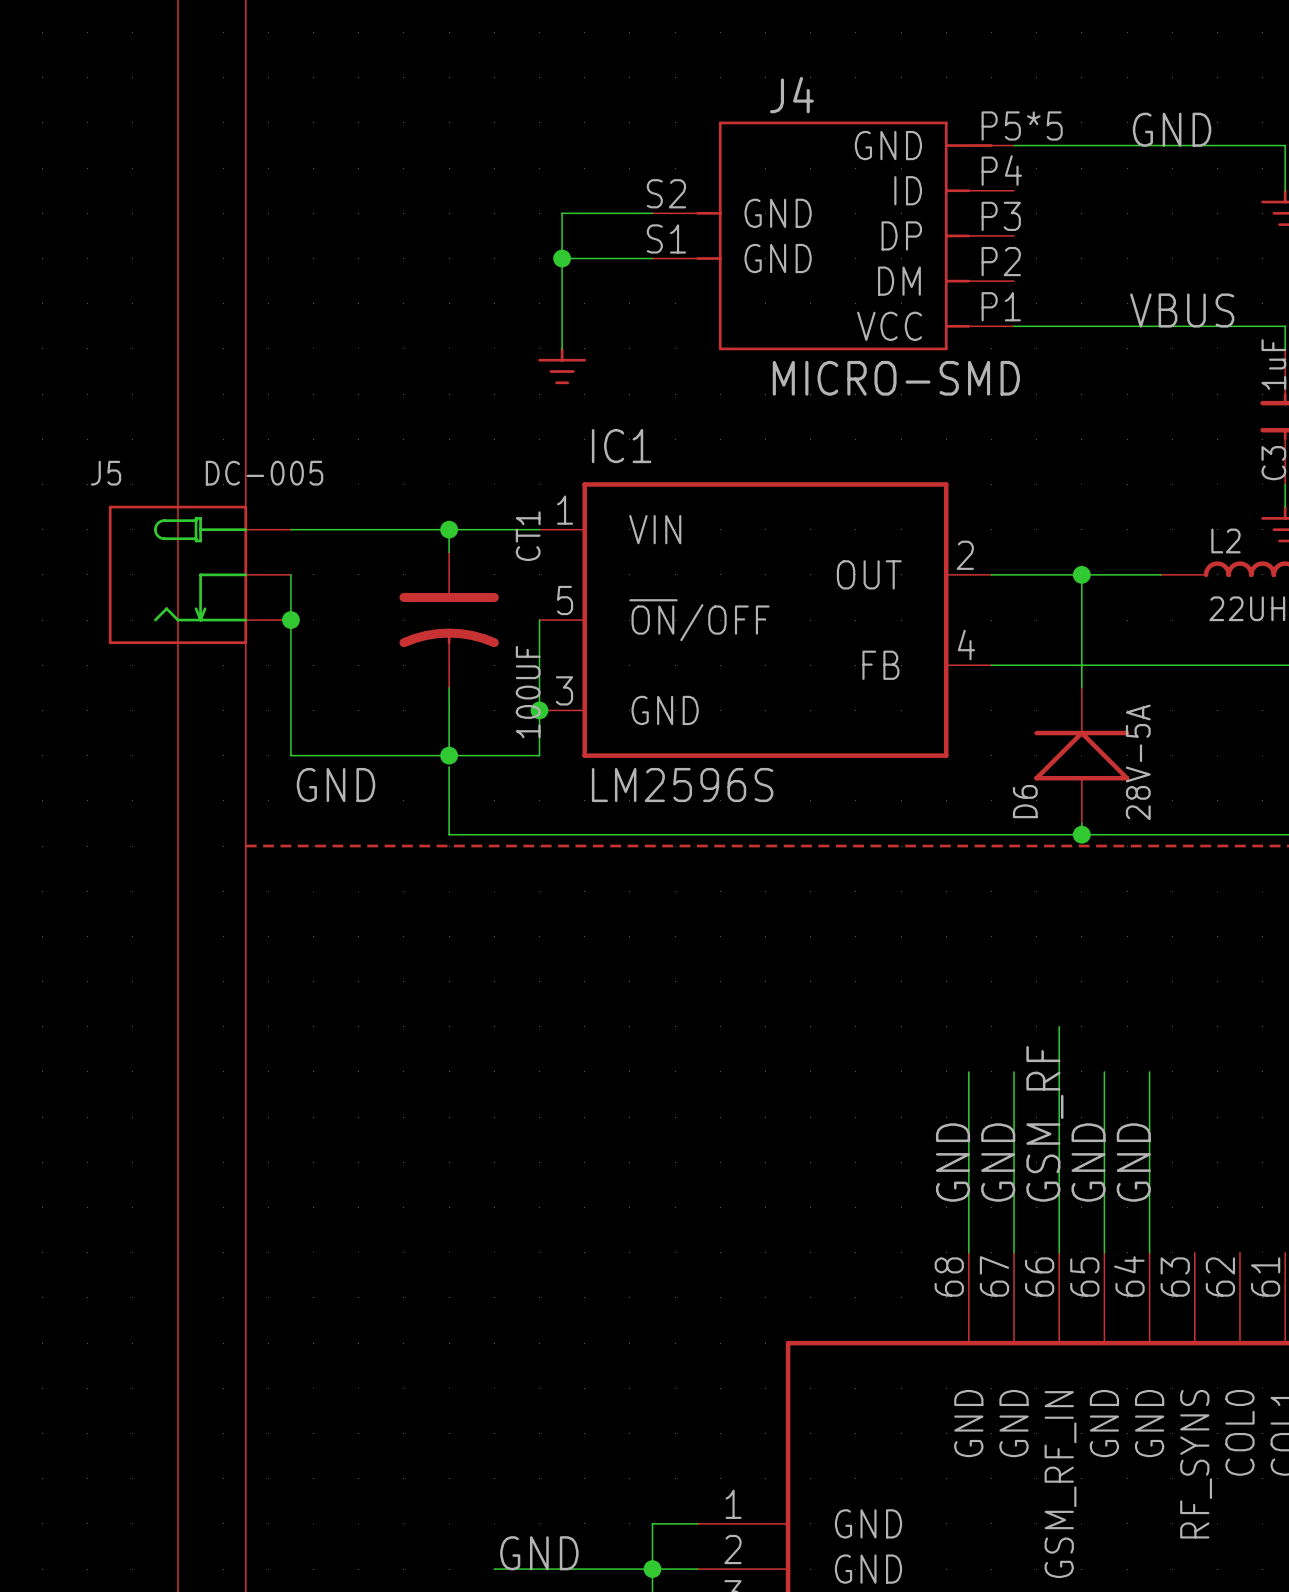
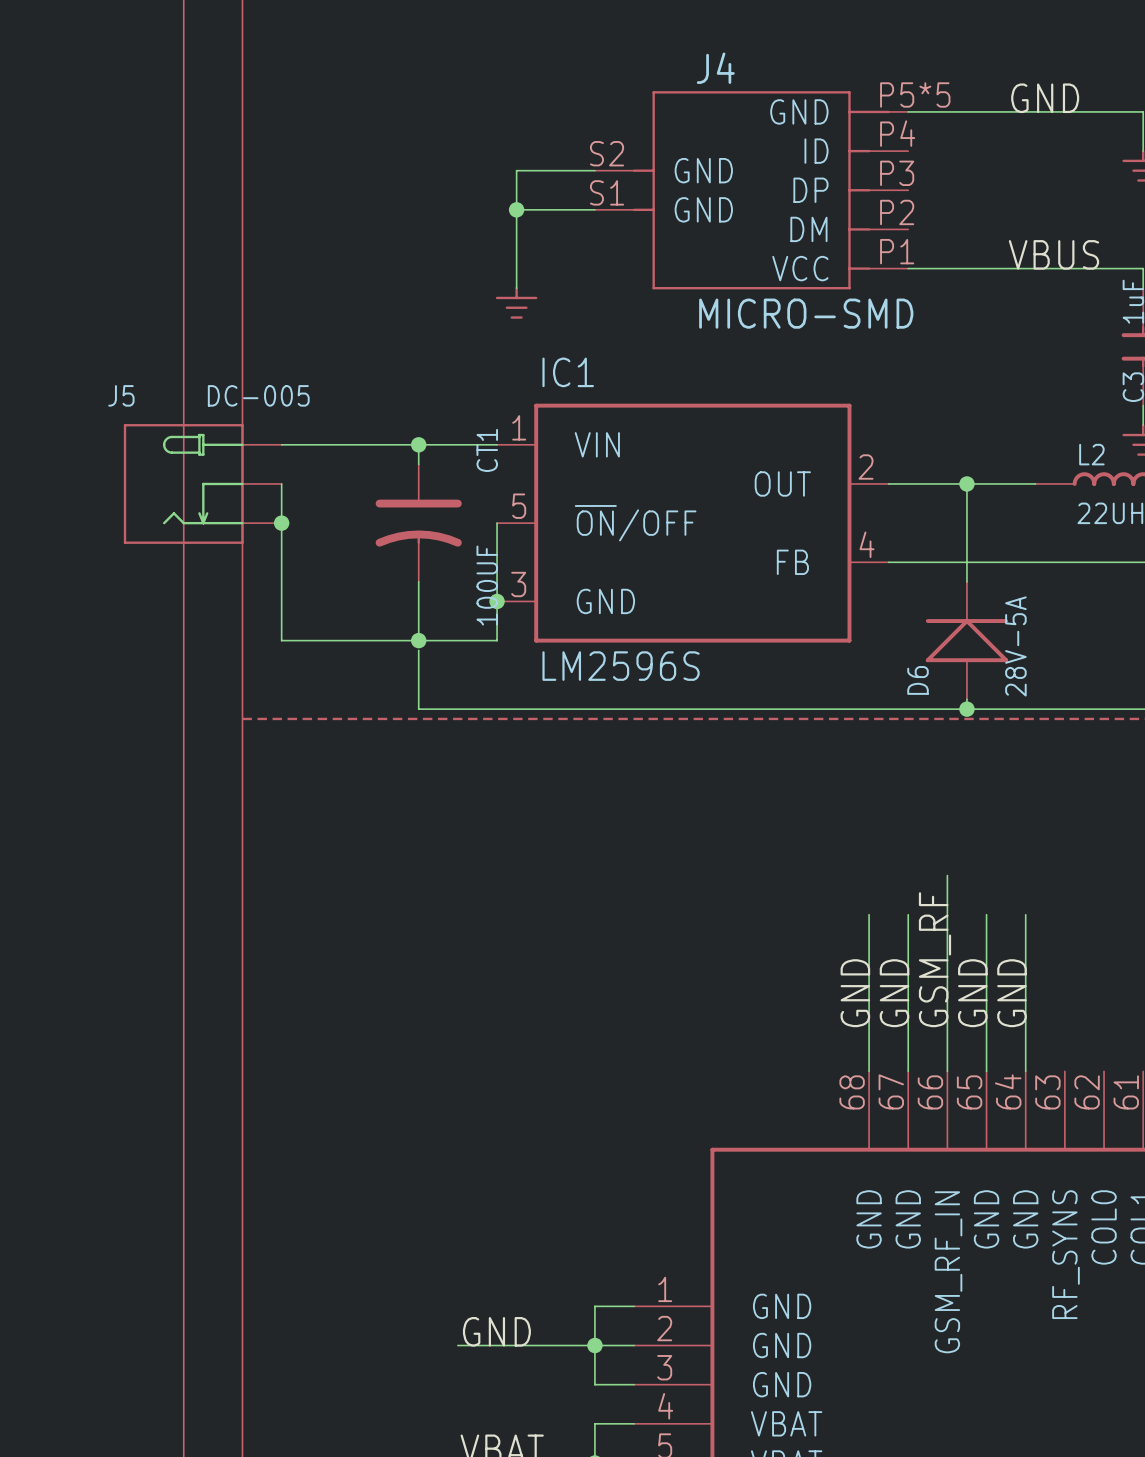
label: GND (336, 785) -> none

